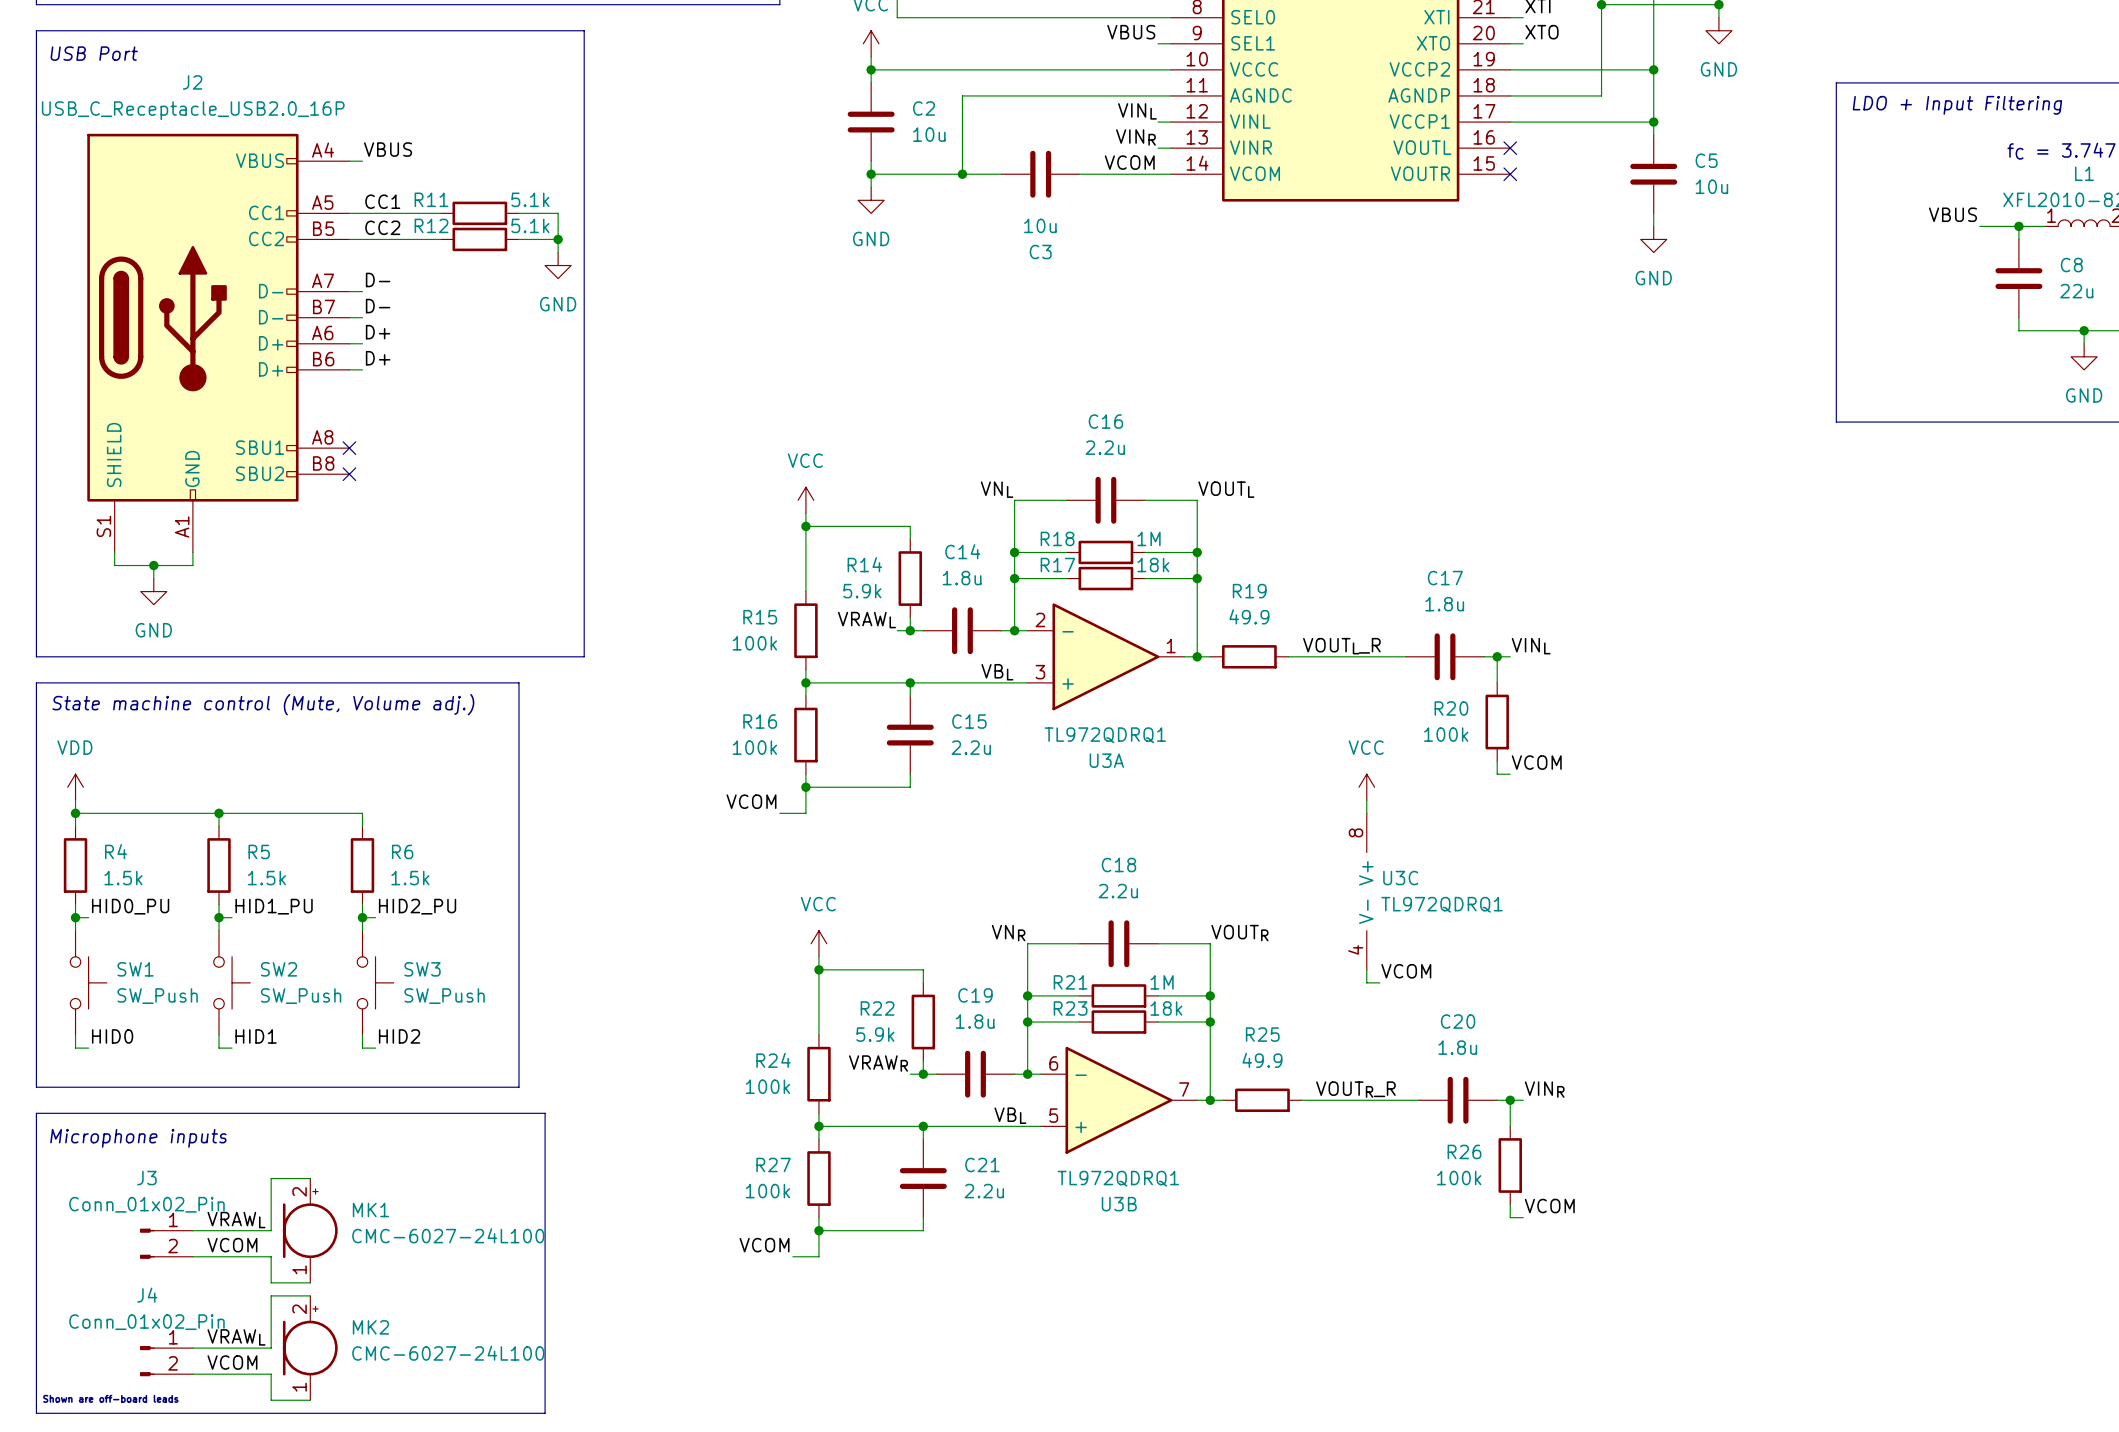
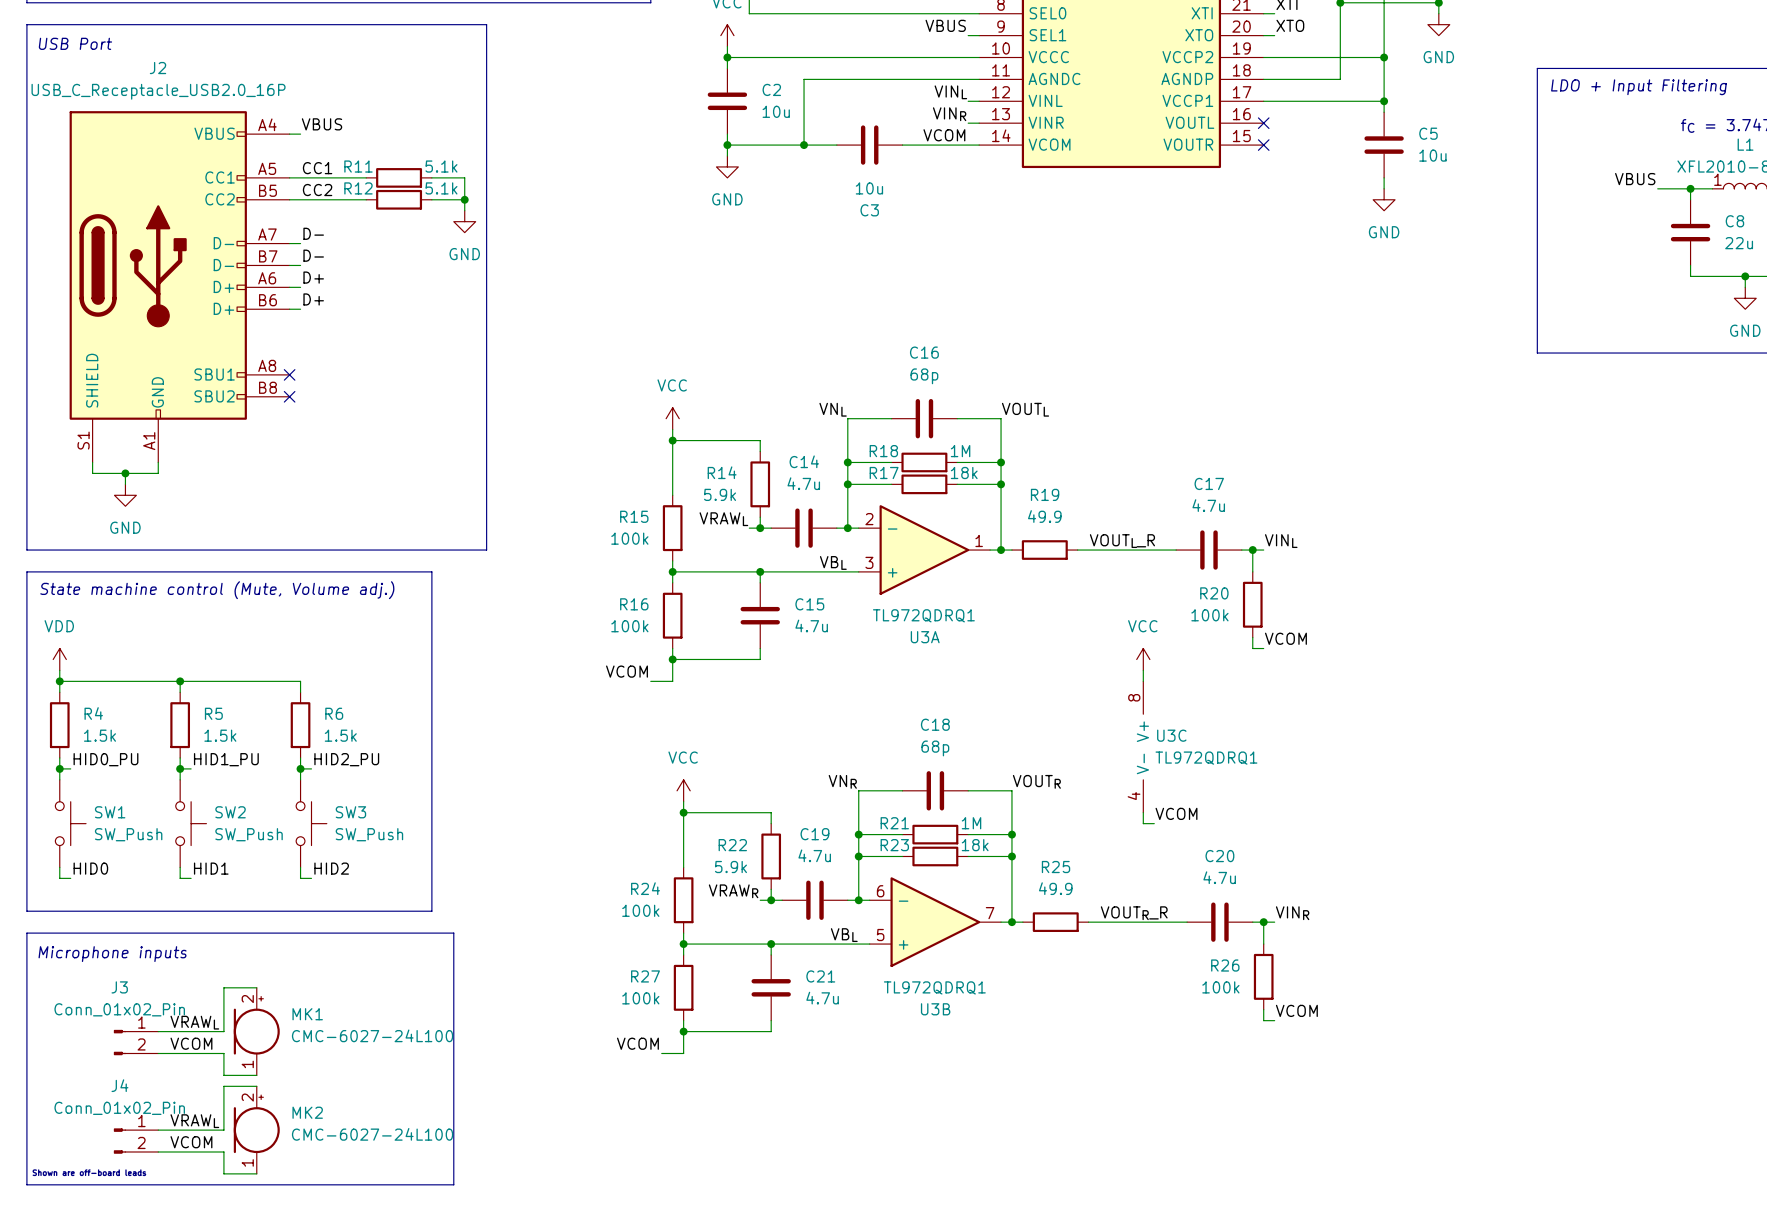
C16 value: 2.2u (1105, 447) -> 68p (924, 376)
C14 value: 1.8u (962, 578) -> 4.7u (803, 483)
C17 value: 1.8u (1444, 604) -> 4.7u (1208, 505)
C15 value: 2.2u (971, 747) -> 4.7u (811, 625)
C18 value: 2.2u (1118, 891) -> 68p (935, 748)
C19 value: 1.8u (975, 1021) -> 4.7u (814, 855)
C20 value: 1.8u (1457, 1047) -> 4.7u (1219, 877)
C21 value: 2.2u (984, 1191) -> 4.7u (822, 998)

